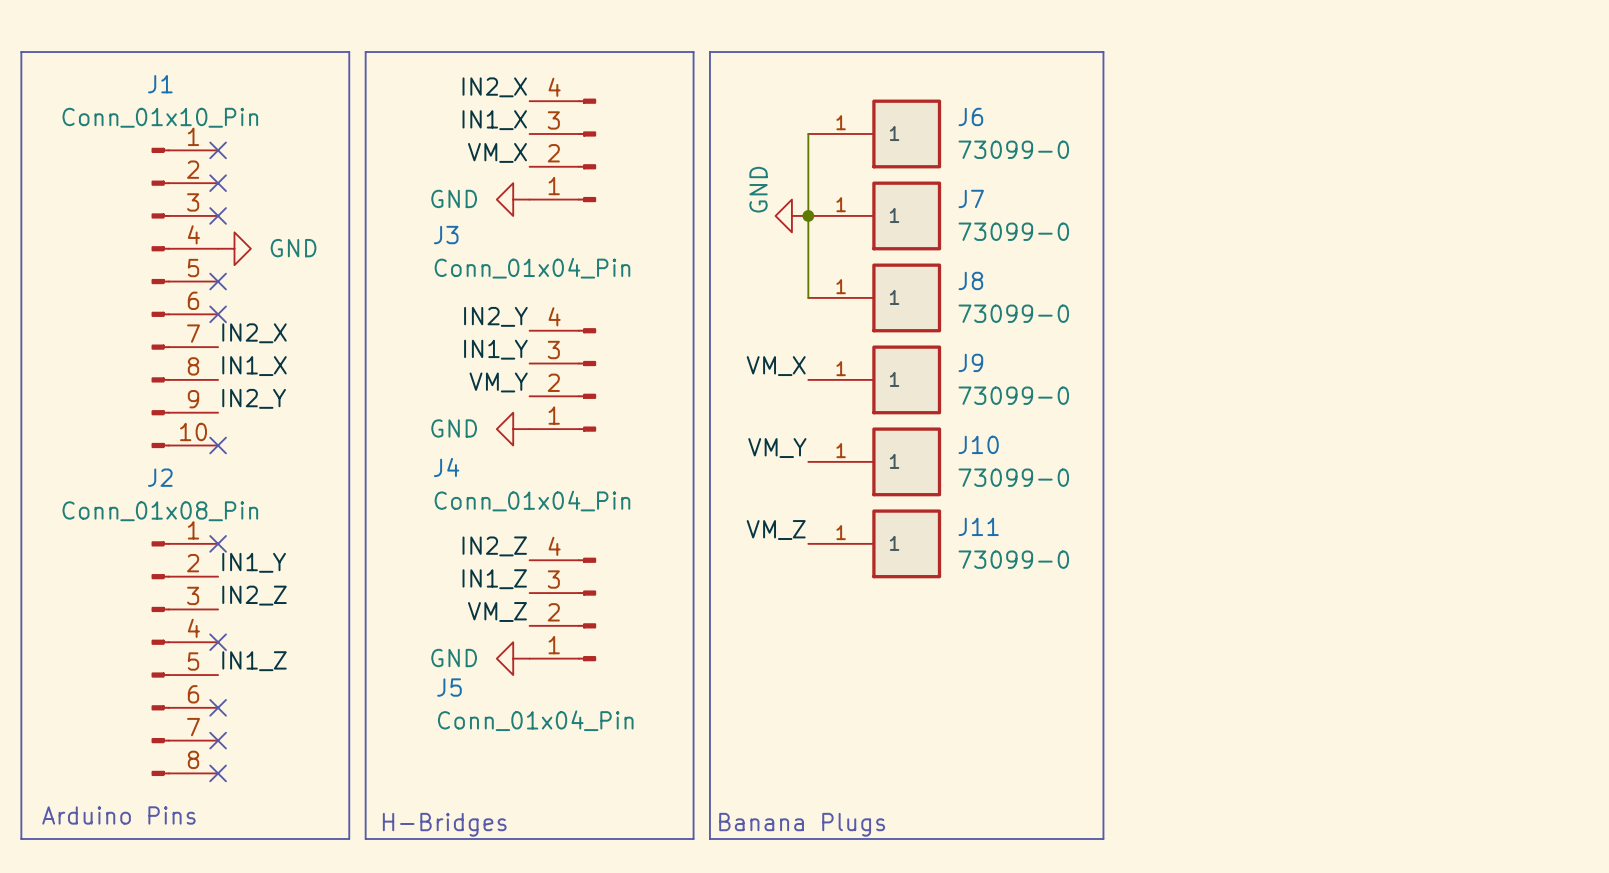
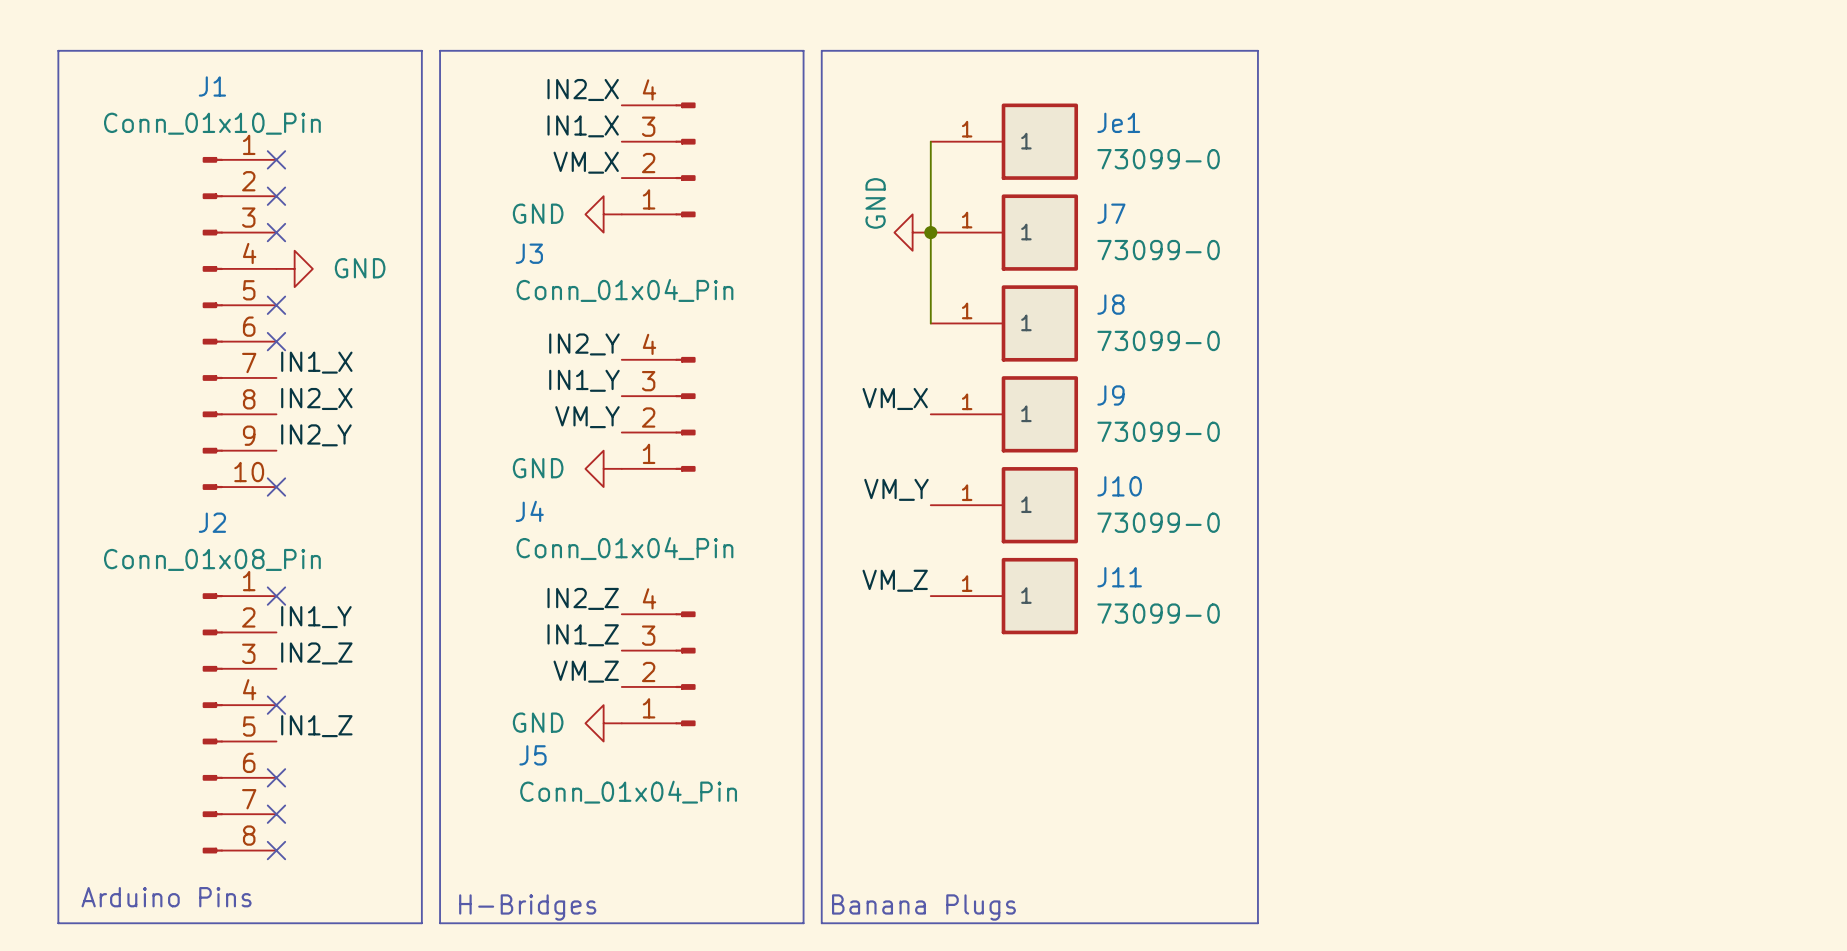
J6 name: J6 (970, 116) -> Je1 (1118, 122)
label: IN2_X (254, 333) -> IN1_X (316, 362)
label: IN1_X (254, 366) -> IN2_X (316, 398)

